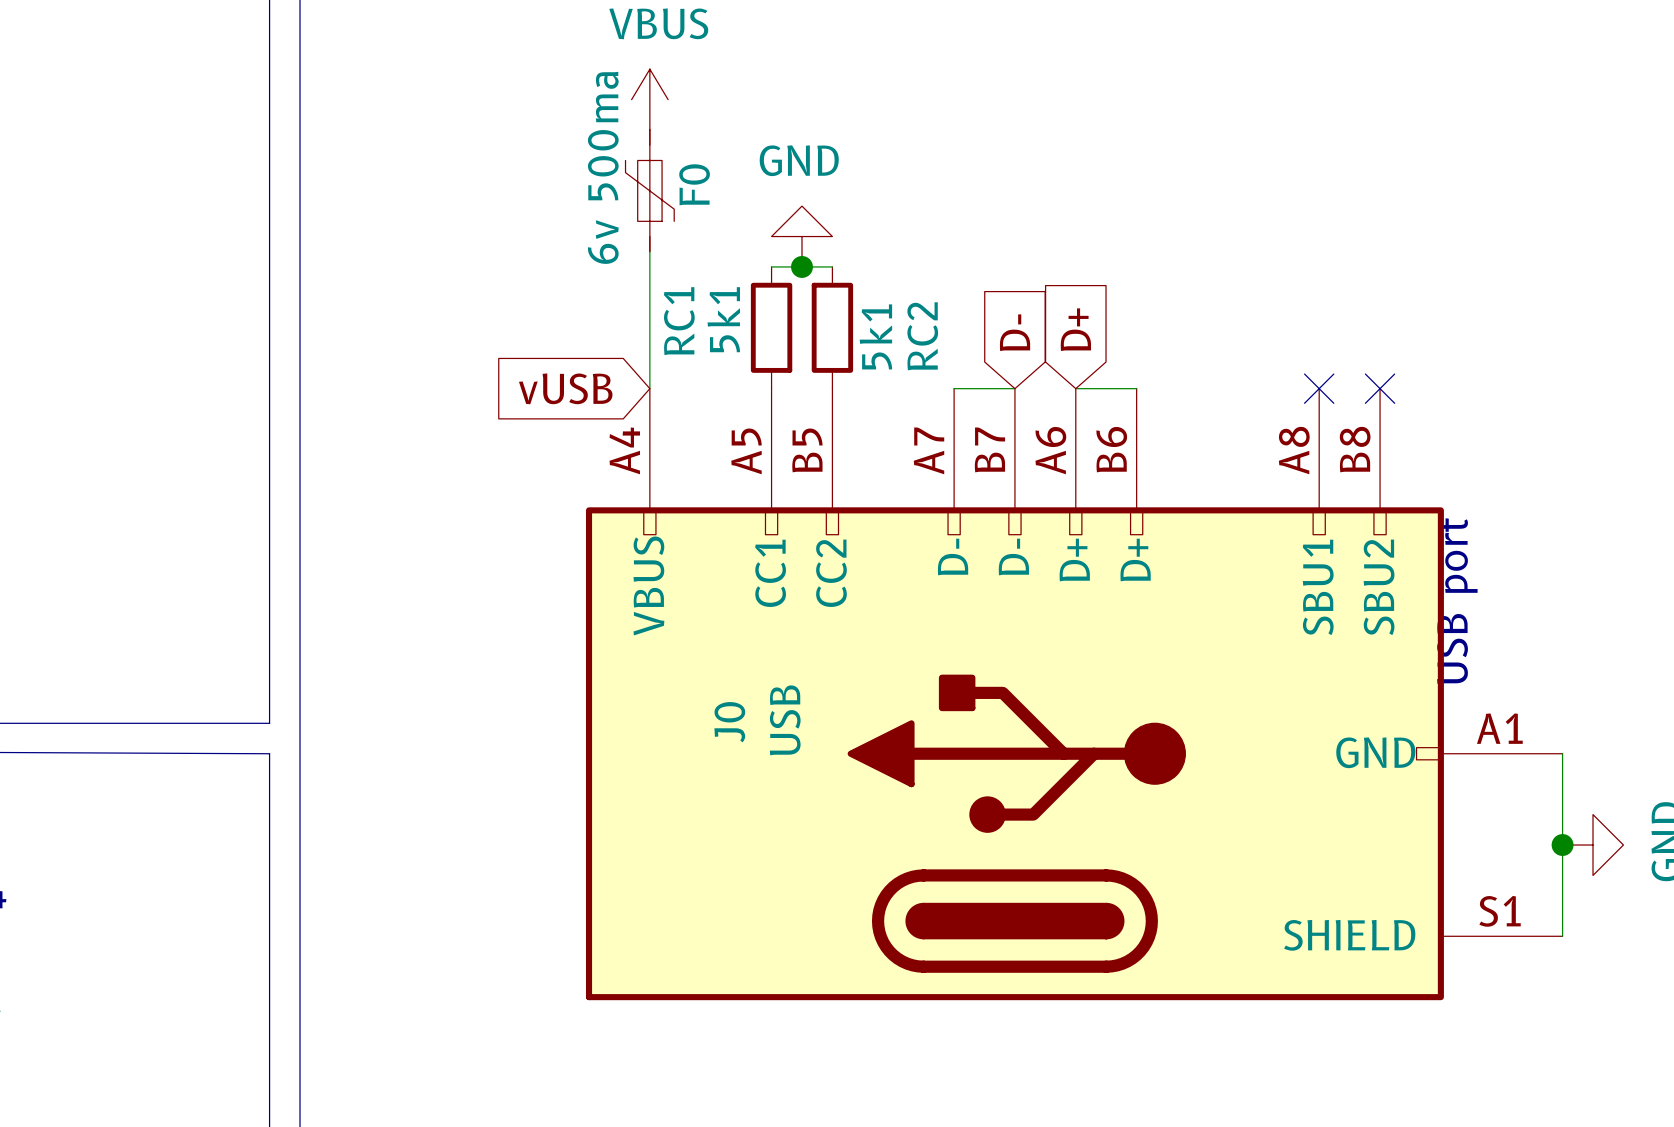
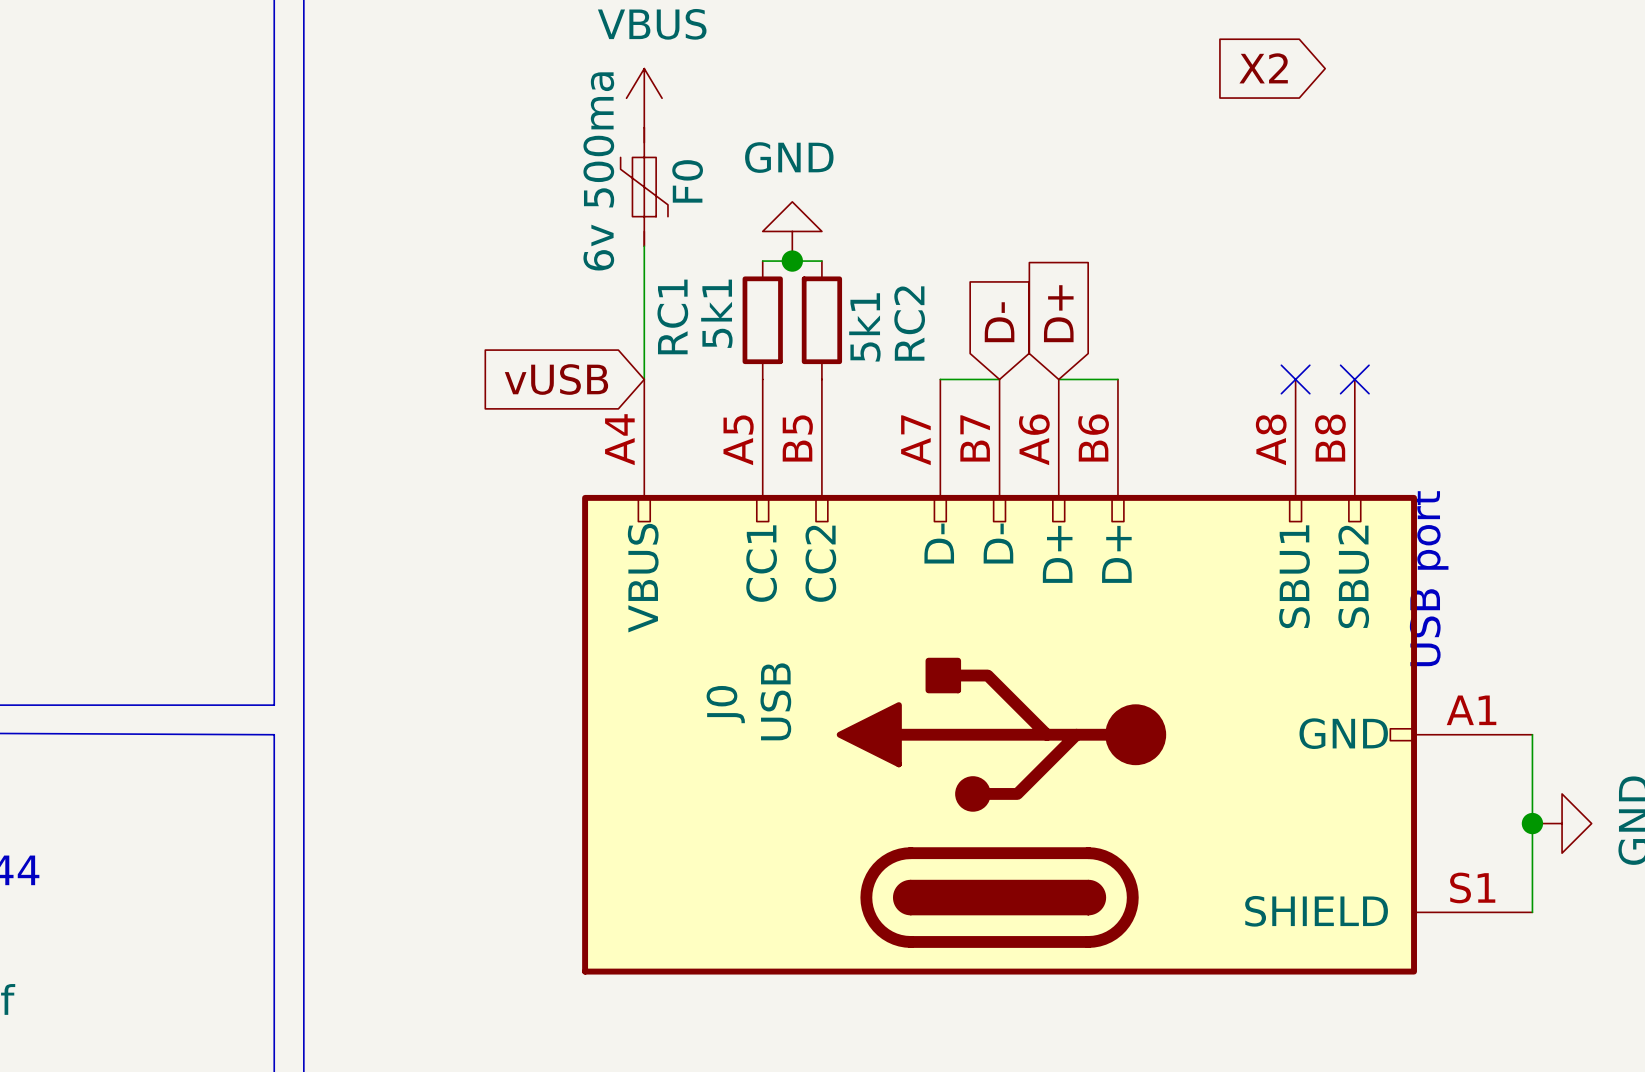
global label: none -> X2 (1263, 68)

